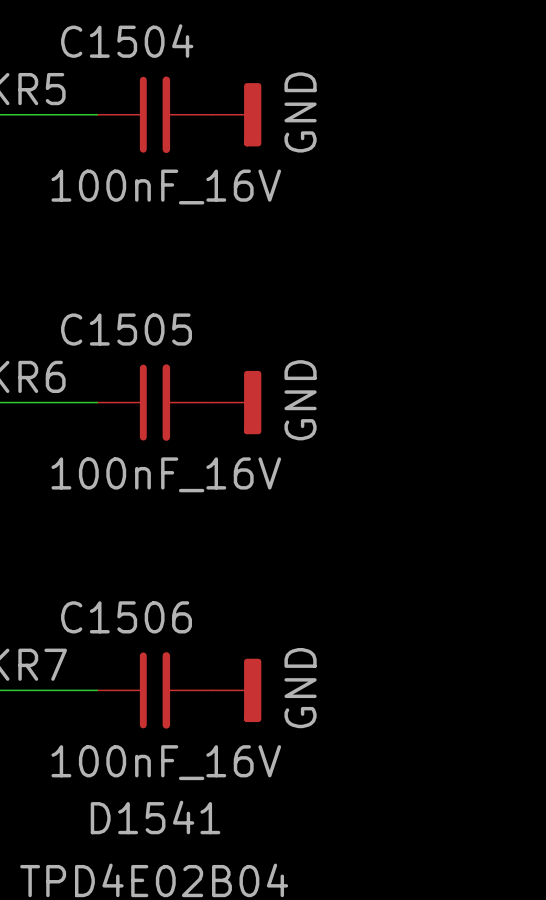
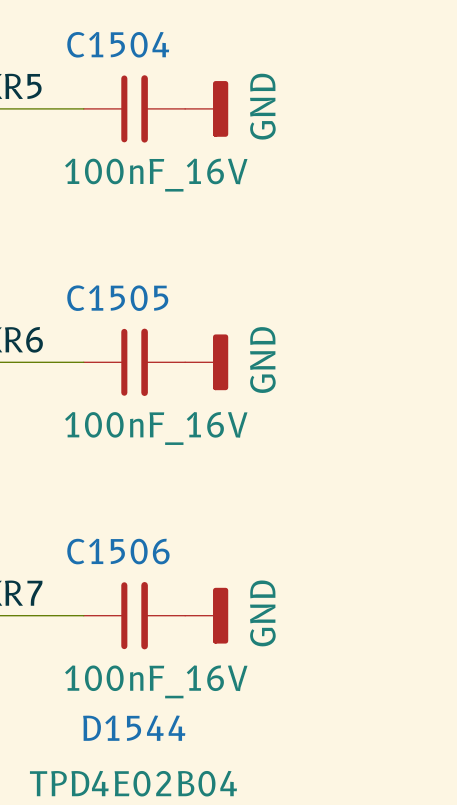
D1541 name: D1541 (155, 817) -> D1544 (134, 728)

